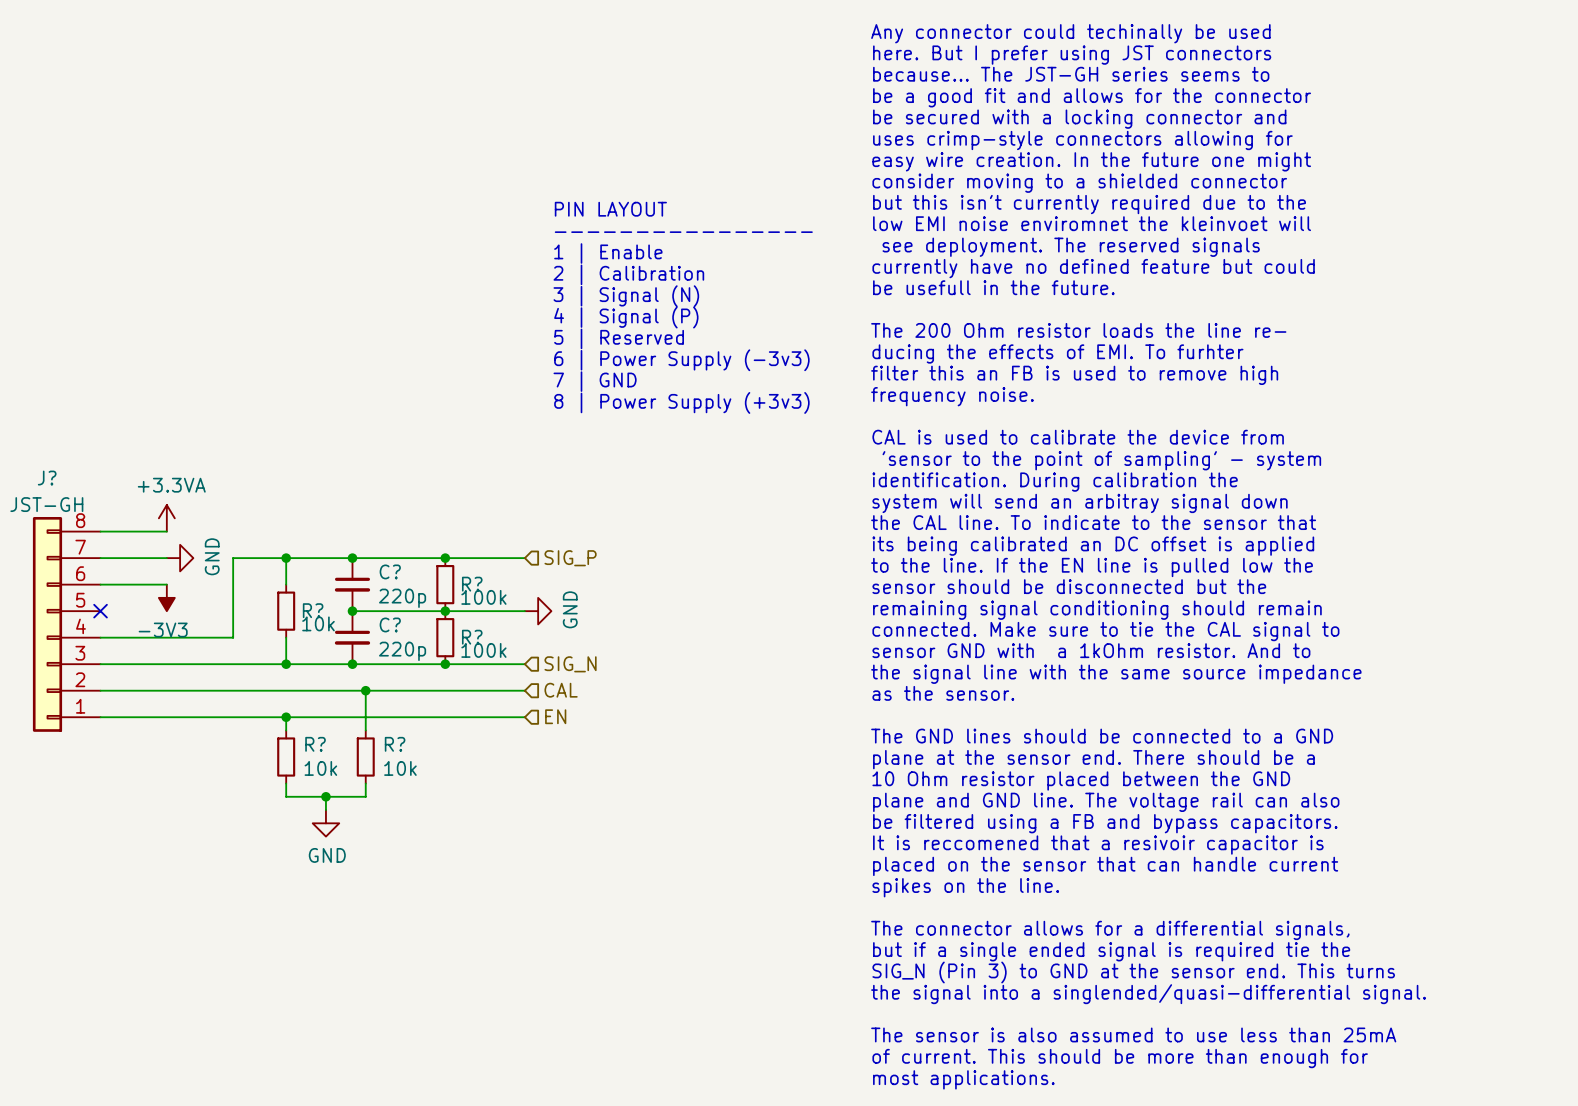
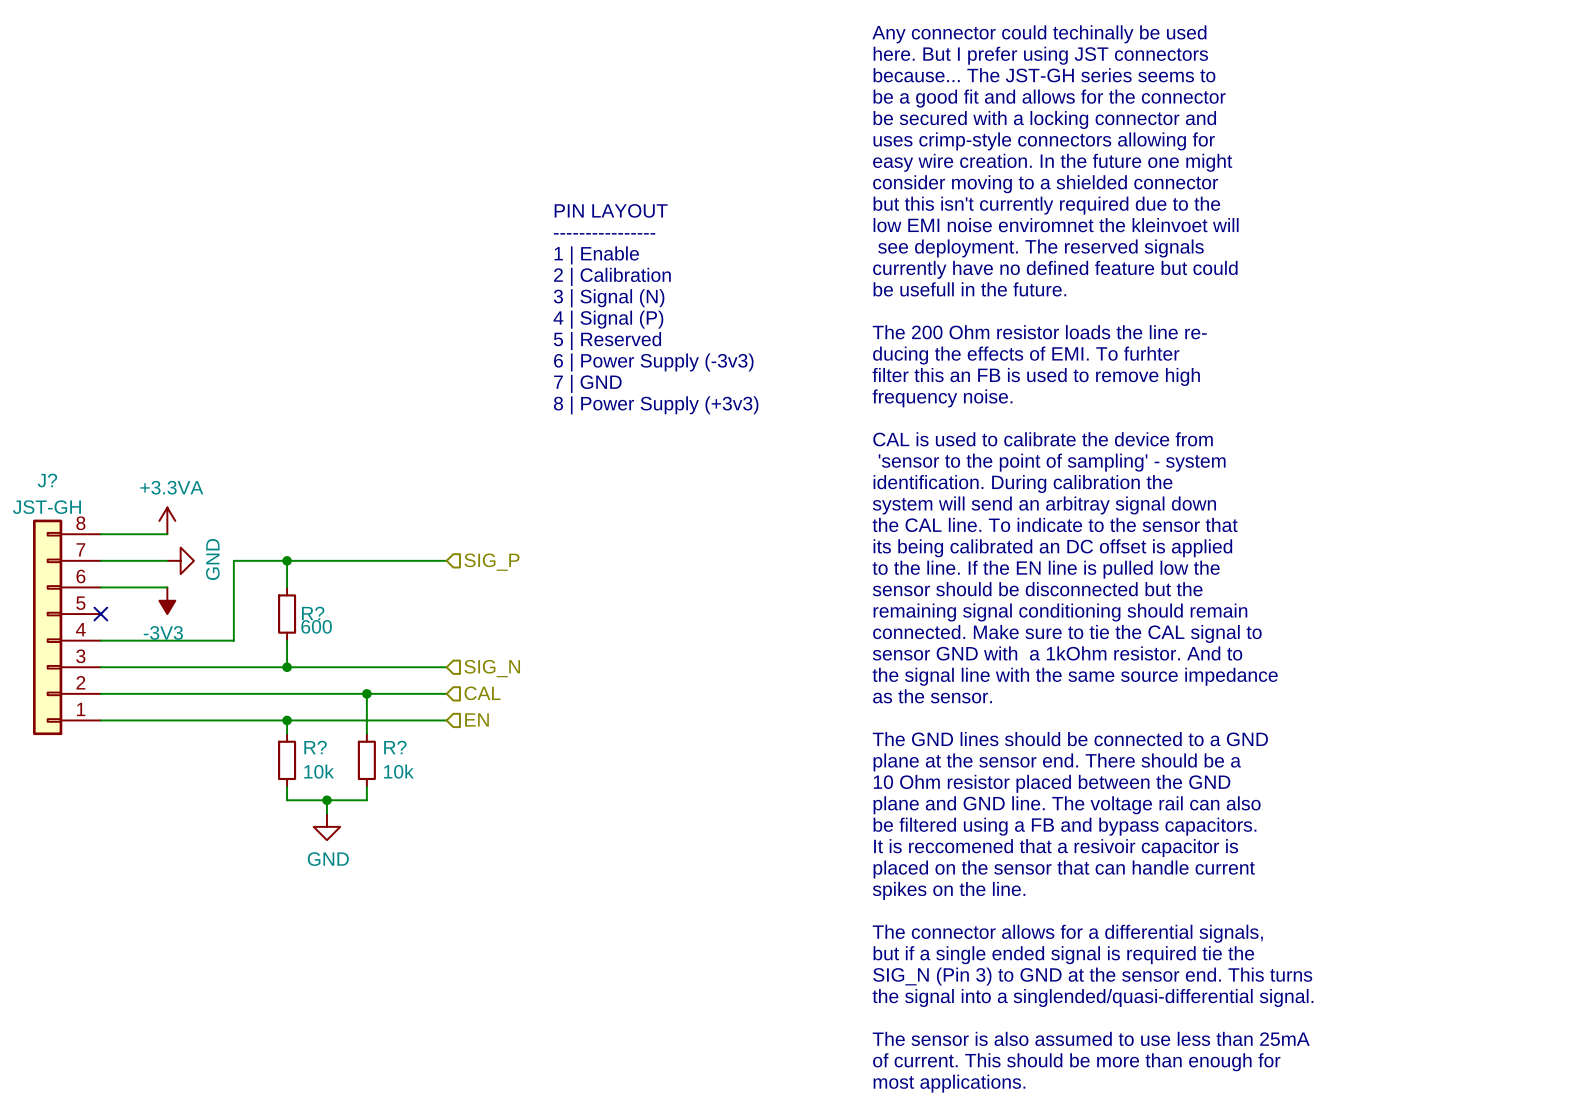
junction: (352, 558) -> none
wire: (445, 558) (524, 558) -> none
junction: (445, 558) -> none
hierarchical label position: SIG_P (570, 558) -> SIG_P (491, 562)
C?: 220p (352, 584) -> none
R?: 100k (445, 584) -> none
wire: (352, 611) (524, 611) -> none
junction: (352, 611) -> none
junction: (445, 611) -> none
power symbol: GND (538, 611) -> none
R? value: 10k (318, 623) -> 600 (316, 626)
C?: 220p (352, 637) -> none
R?: 100k (445, 637) -> none
junction: (352, 664) -> none
wire: (445, 664) (524, 664) -> none
junction: (445, 664) -> none
hierarchical label position: SIG_N (570, 664) -> SIG_N (492, 668)
wire: (445, 690) (524, 690) -> none
hierarchical label position: CAL (561, 690) -> CAL (482, 693)
hierarchical label position: EN (555, 716) -> EN (477, 719)
wire: (445, 717) (524, 717) -> none

